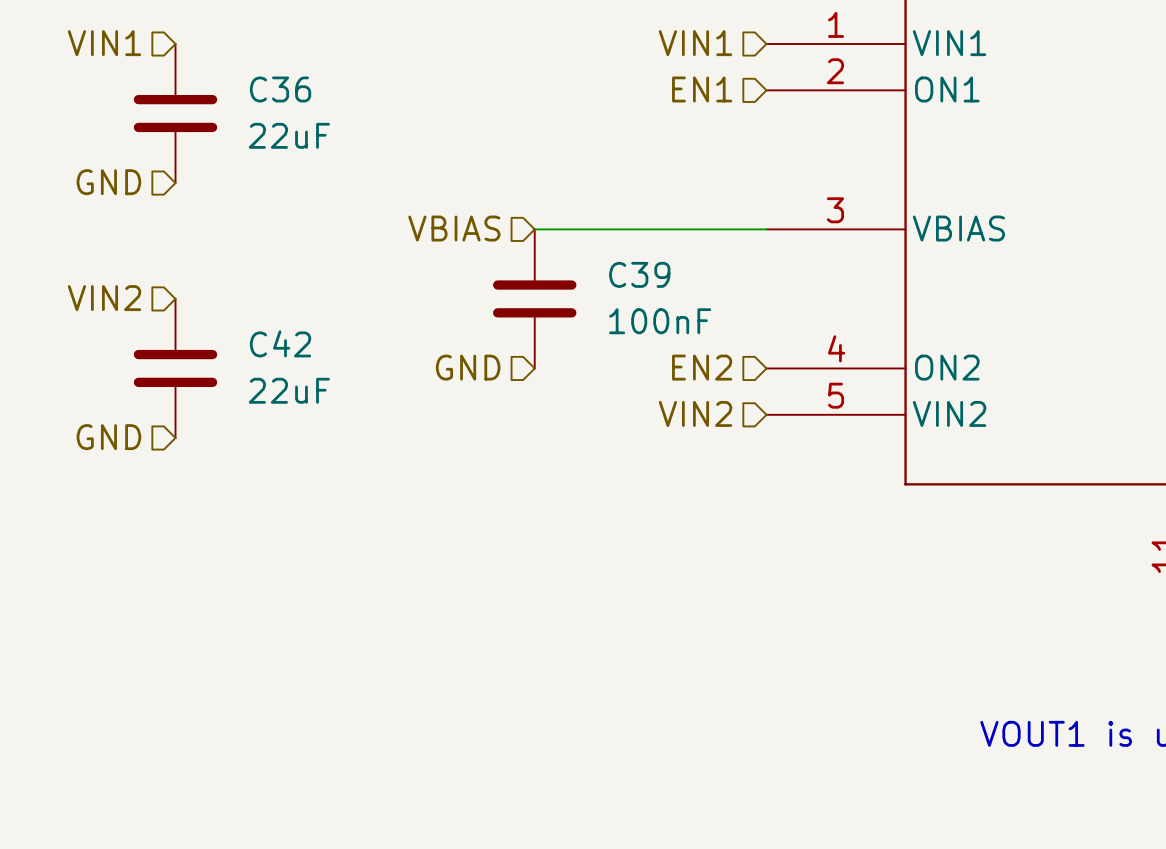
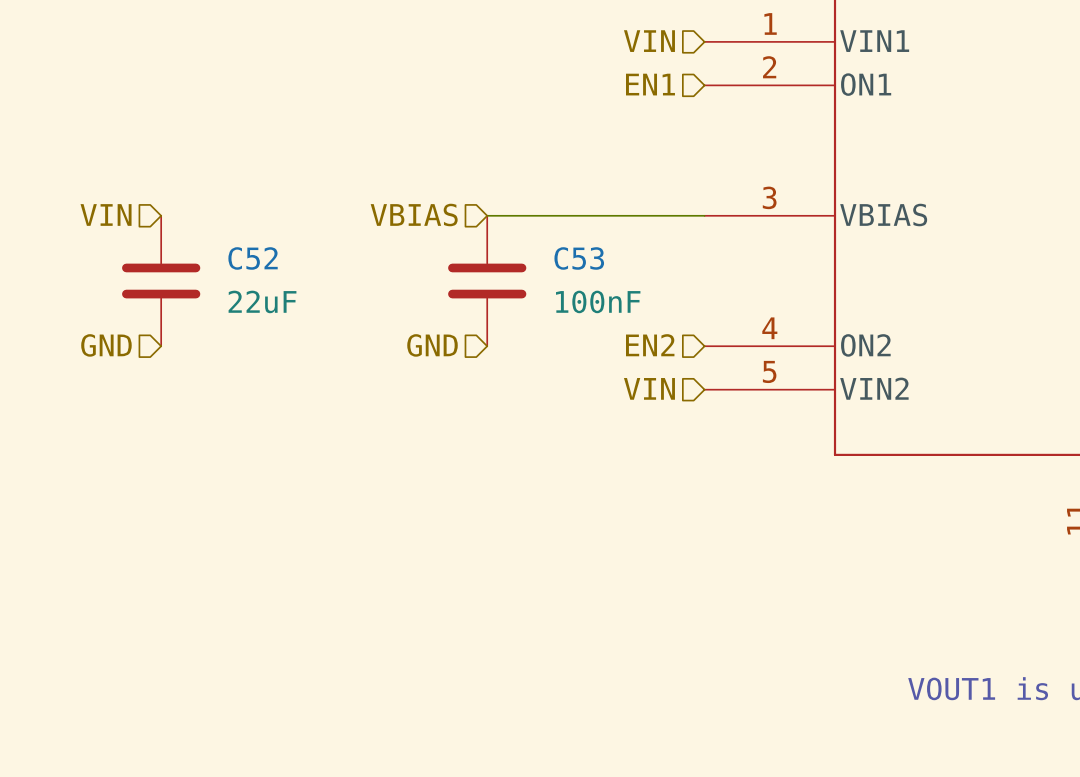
hierarchical label: VIN1 (104, 43) -> none
hierarchical label: VIN1 (695, 43) -> VIN (649, 41)
C36: 22uF (175, 113) -> none
hierarchical label: GND (108, 182) -> none
hierarchical label: none -> VIN (106, 214)
C39 name: C39 (639, 274) -> C53 (579, 258)
hierarchical label: VIN2 (104, 298) -> none
C52: none -> 22uF (161, 281)
C42: 22uF (175, 368) -> none
hierarchical label: VIN2 (695, 413) -> VIN (649, 388)
hierarchical label position: GND (108, 437) -> GND (106, 345)

